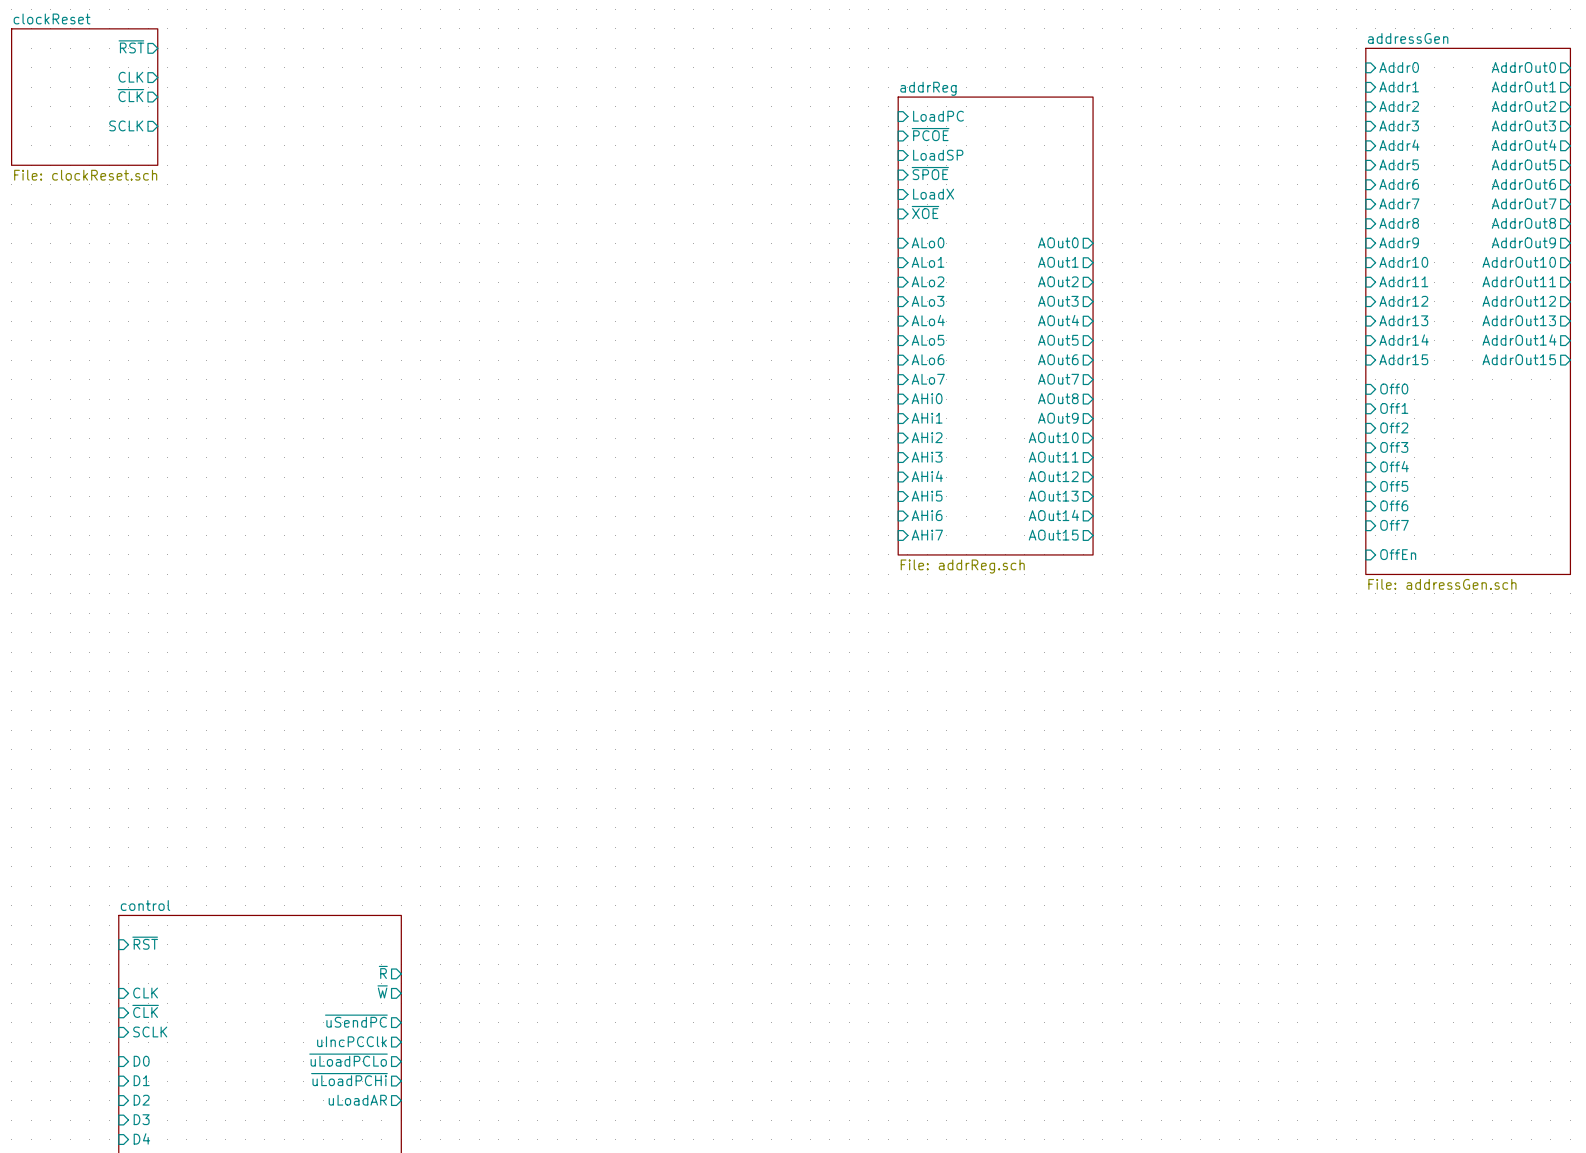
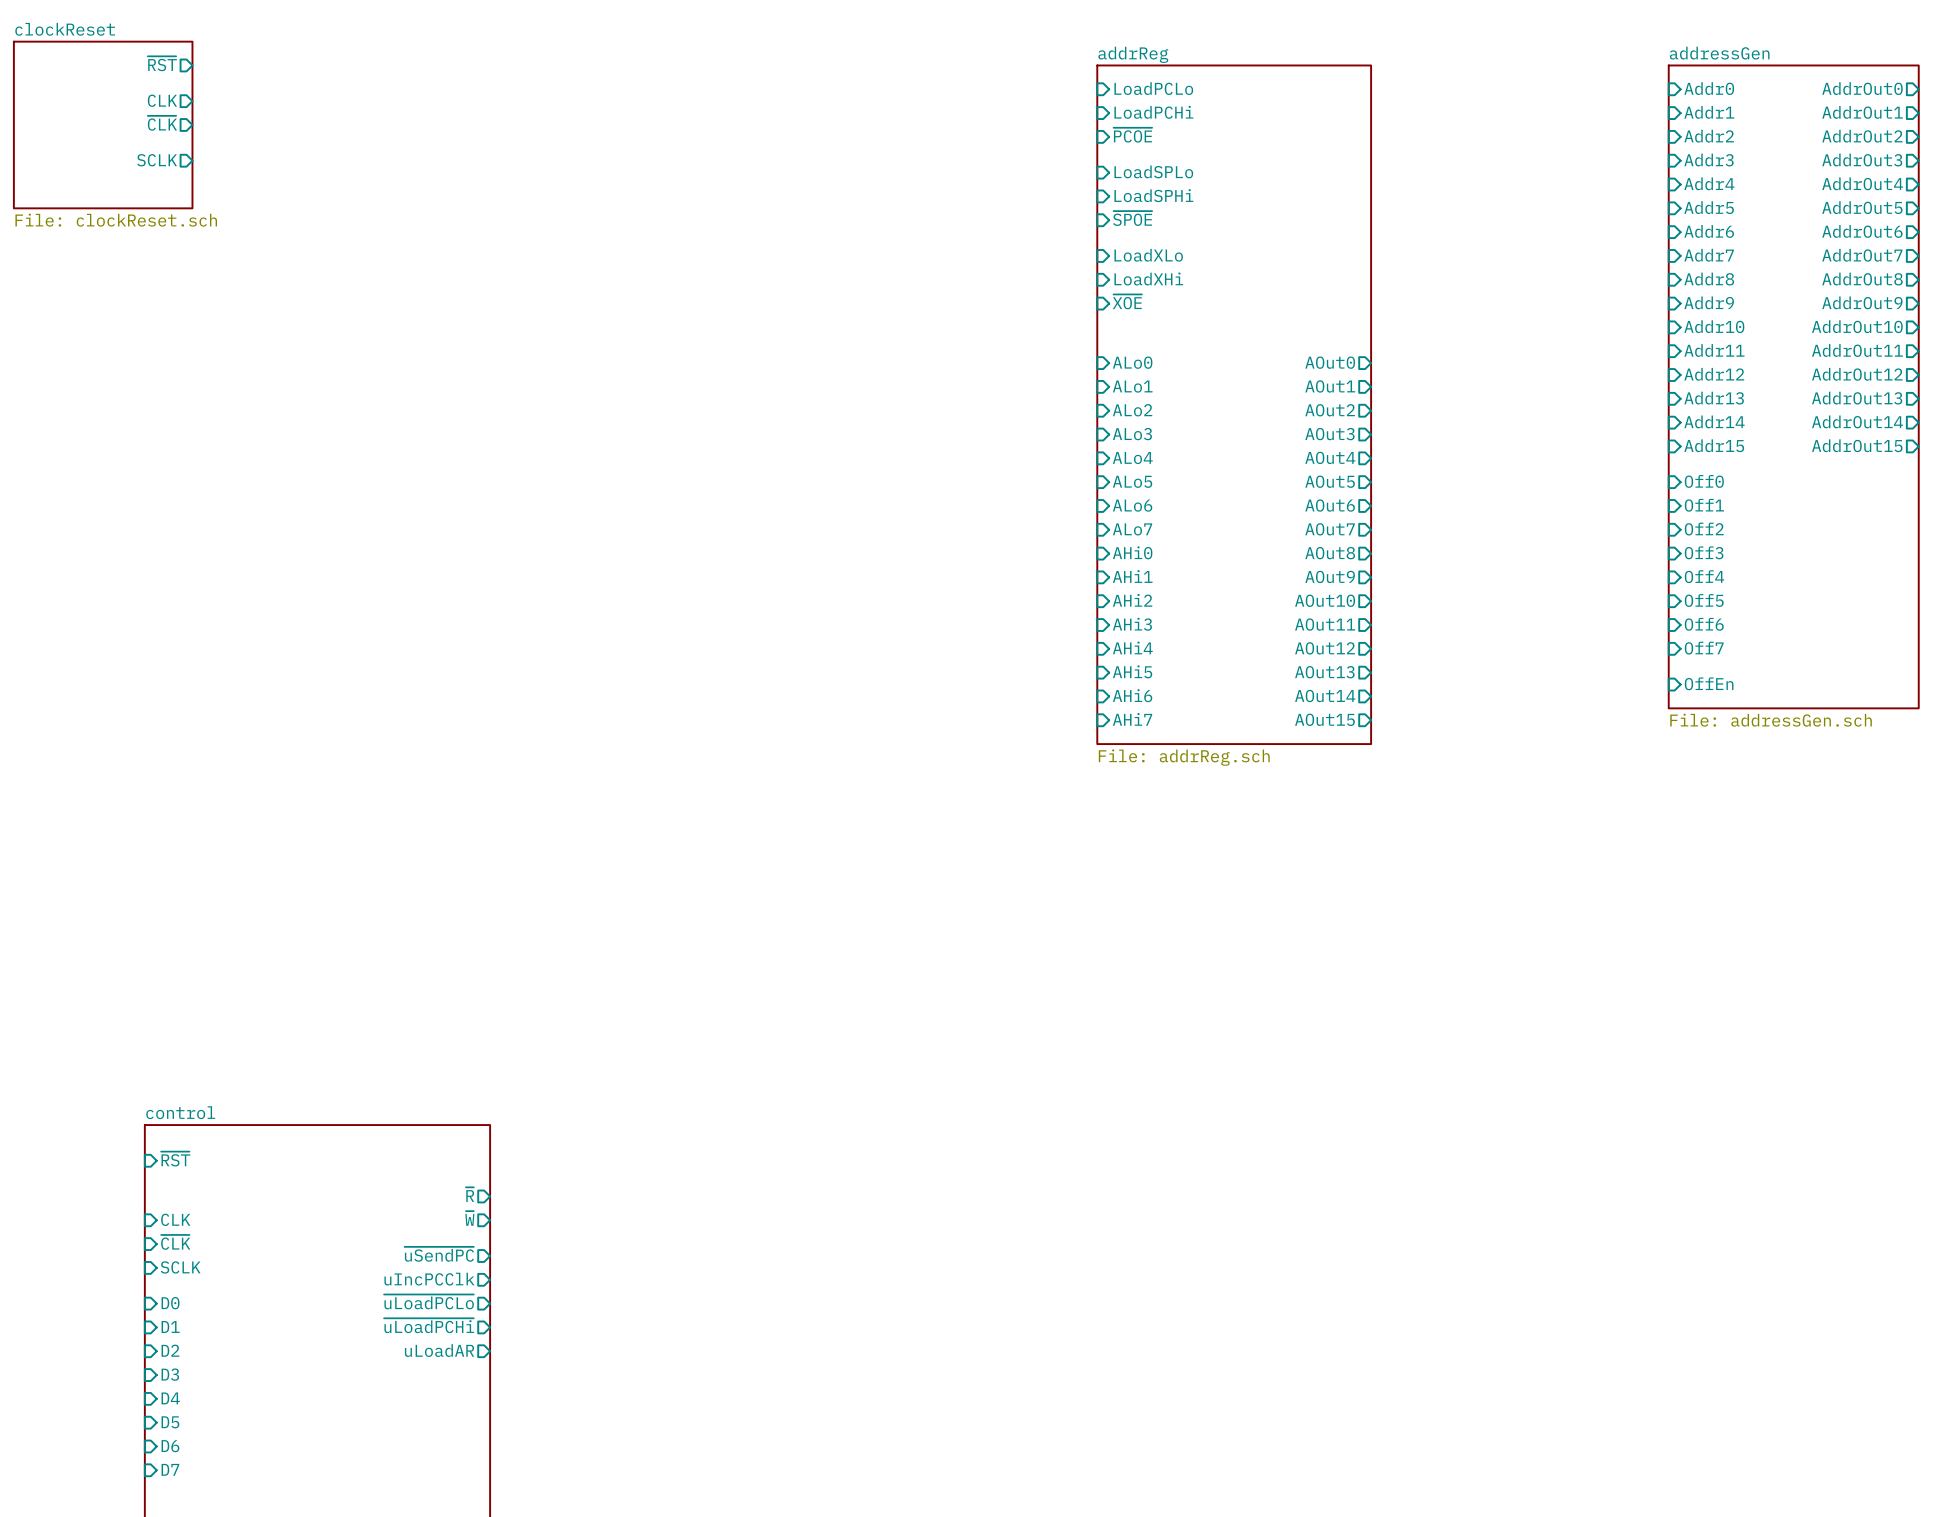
sheet pin: none -> LoadPCLo (1153, 88)
sheet pin: none -> LoadPCHi (1153, 112)
sheet pin: none -> ~{PCOE} (1132, 135)
sheet pin: LoadPC (938, 116) -> none
sheet pin: ~{PCOE} (930, 134) -> LoadSPLo (1153, 171)
sheet pin: LoadSP (938, 155) -> LoadSPHi (1153, 195)
sheet pin: LoadX (933, 194) -> LoadXLo (1148, 255)
sheet pin: ~{XOE} (925, 212) -> none
sheet pin: none -> LoadXHi (1148, 278)
sheet pin: ALo0 (928, 242) -> ~{XOE} (1127, 301)
sheet pin position: AOut0 (1058, 242) -> AOut0 (1330, 362)
sheet pin position: ALo1 (928, 262) -> ALo1 (1132, 386)
sheet pin position: AOut1 (1058, 262) -> AOut1 (1330, 386)
sheet pin position: ALo2 (928, 281) -> ALo2 (1132, 410)
sheet pin position: AOut2 (1058, 281) -> AOut2 (1330, 410)
sheet pin: none -> ALo0 (1132, 362)
sheet pin position: ALo3 (928, 301) -> ALo3 (1132, 434)
sheet pin position: AOut3 (1058, 301) -> AOut3 (1329, 434)
sheet pin position: ALo4 (928, 320) -> ALo4 (1132, 458)
sheet pin position: AOut4 (1058, 320) -> AOut4 (1330, 457)
sheet addrReg: File: addrReg.sch (995, 326) -> none
sheet addrReg: none -> File: addrReg.sch (1234, 404)
sheet pin position: ALo5 (928, 340) -> ALo5 (1132, 481)
sheet pin position: AOut5 (1058, 340) -> AOut5 (1330, 481)
sheet pin position: ALo6 (928, 359) -> ALo6 (1132, 505)
sheet pin position: AOut6 (1058, 359) -> AOut6 (1330, 505)
sheet pin position: ALo7 (928, 379) -> ALo7 (1132, 529)
sheet pin position: AOut7 (1058, 379) -> AOut7 (1330, 529)
sheet pin position: AHi0 (927, 398) -> AHi0 (1132, 552)
sheet pin position: AOut8 (1058, 398) -> AOut8 (1330, 553)
sheet pin position: AHi1 (927, 418) -> AHi1 (1132, 576)
sheet pin position: AOut9 (1058, 418) -> AOut9 (1330, 576)
sheet pin position: AHi2 (927, 437) -> AHi2 (1132, 600)
sheet pin position: AOut10 (1053, 437) -> AOut10 (1325, 600)
sheet pin position: AHi3 (927, 457) -> AHi3 (1132, 624)
sheet pin position: AOut11 (1053, 457) -> AOut11 (1325, 624)
sheet pin position: AHi4 (927, 476) -> AHi4 (1132, 647)
sheet pin position: AOut12 (1053, 476) -> AOut12 (1325, 648)
sheet pin position: AHi5 (927, 496) -> AHi5 (1132, 671)
sheet pin position: AOut13 (1053, 496) -> AOut13 (1324, 672)
sheet pin position: AHi6 (927, 515) -> AHi6 (1132, 695)
sheet pin position: AOut14 (1053, 515) -> AOut14 (1325, 696)
sheet pin position: AHi7 (927, 535) -> AHi7 (1132, 719)
sheet pin position: AOut15 (1053, 535) -> AOut15 (1324, 719)

